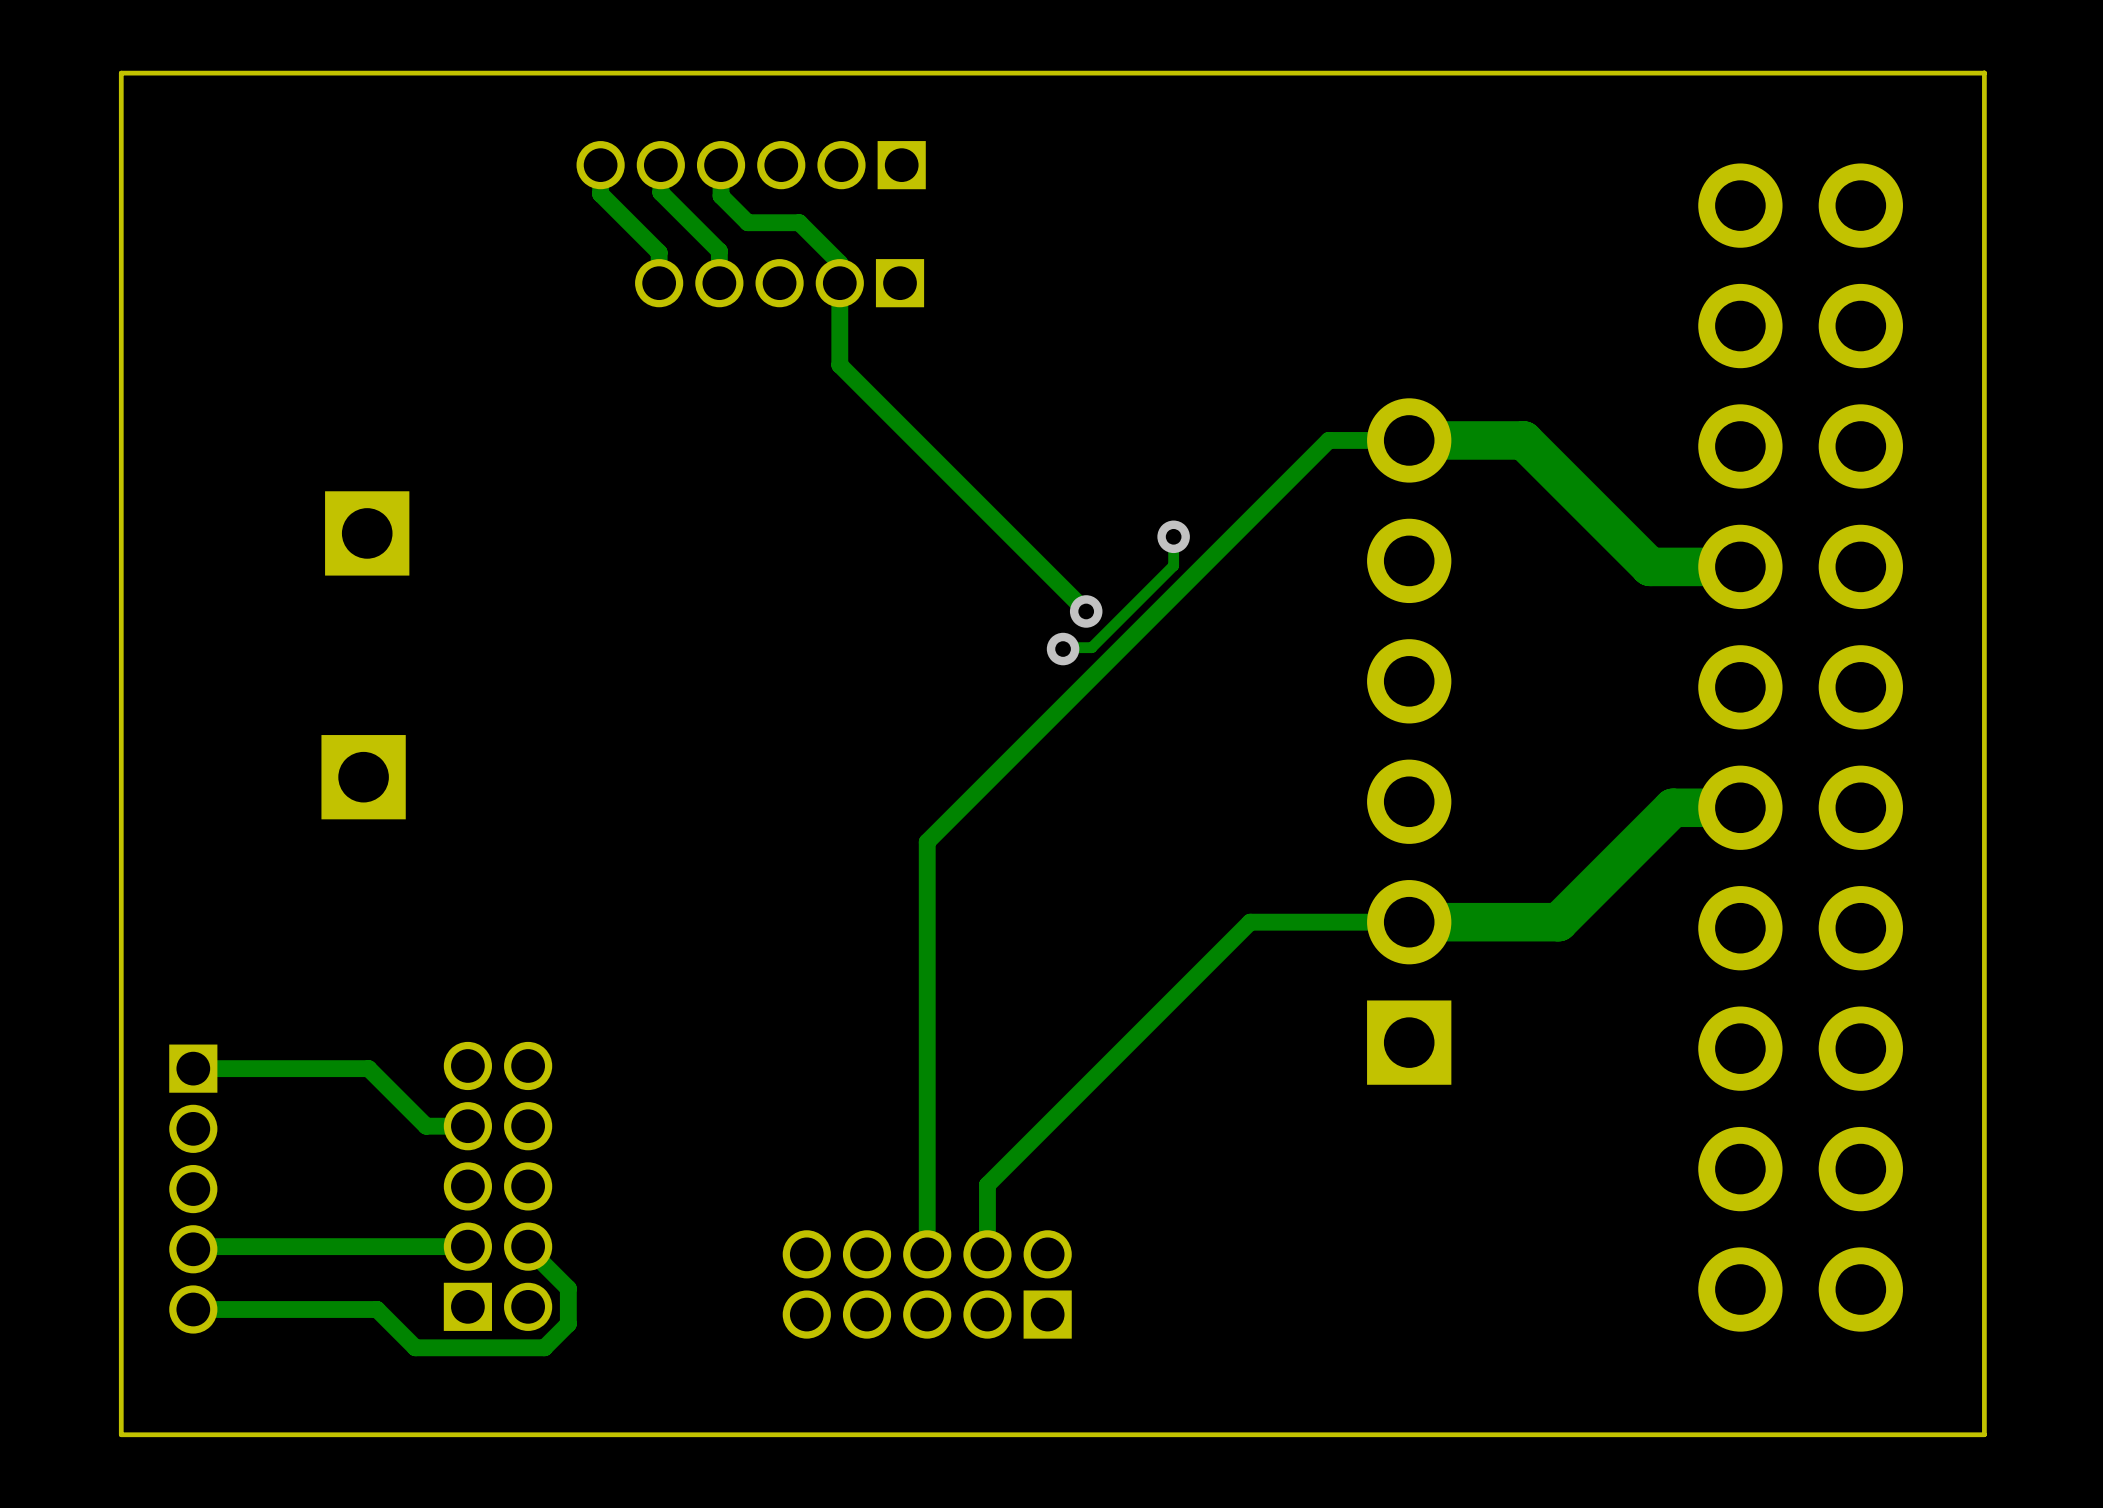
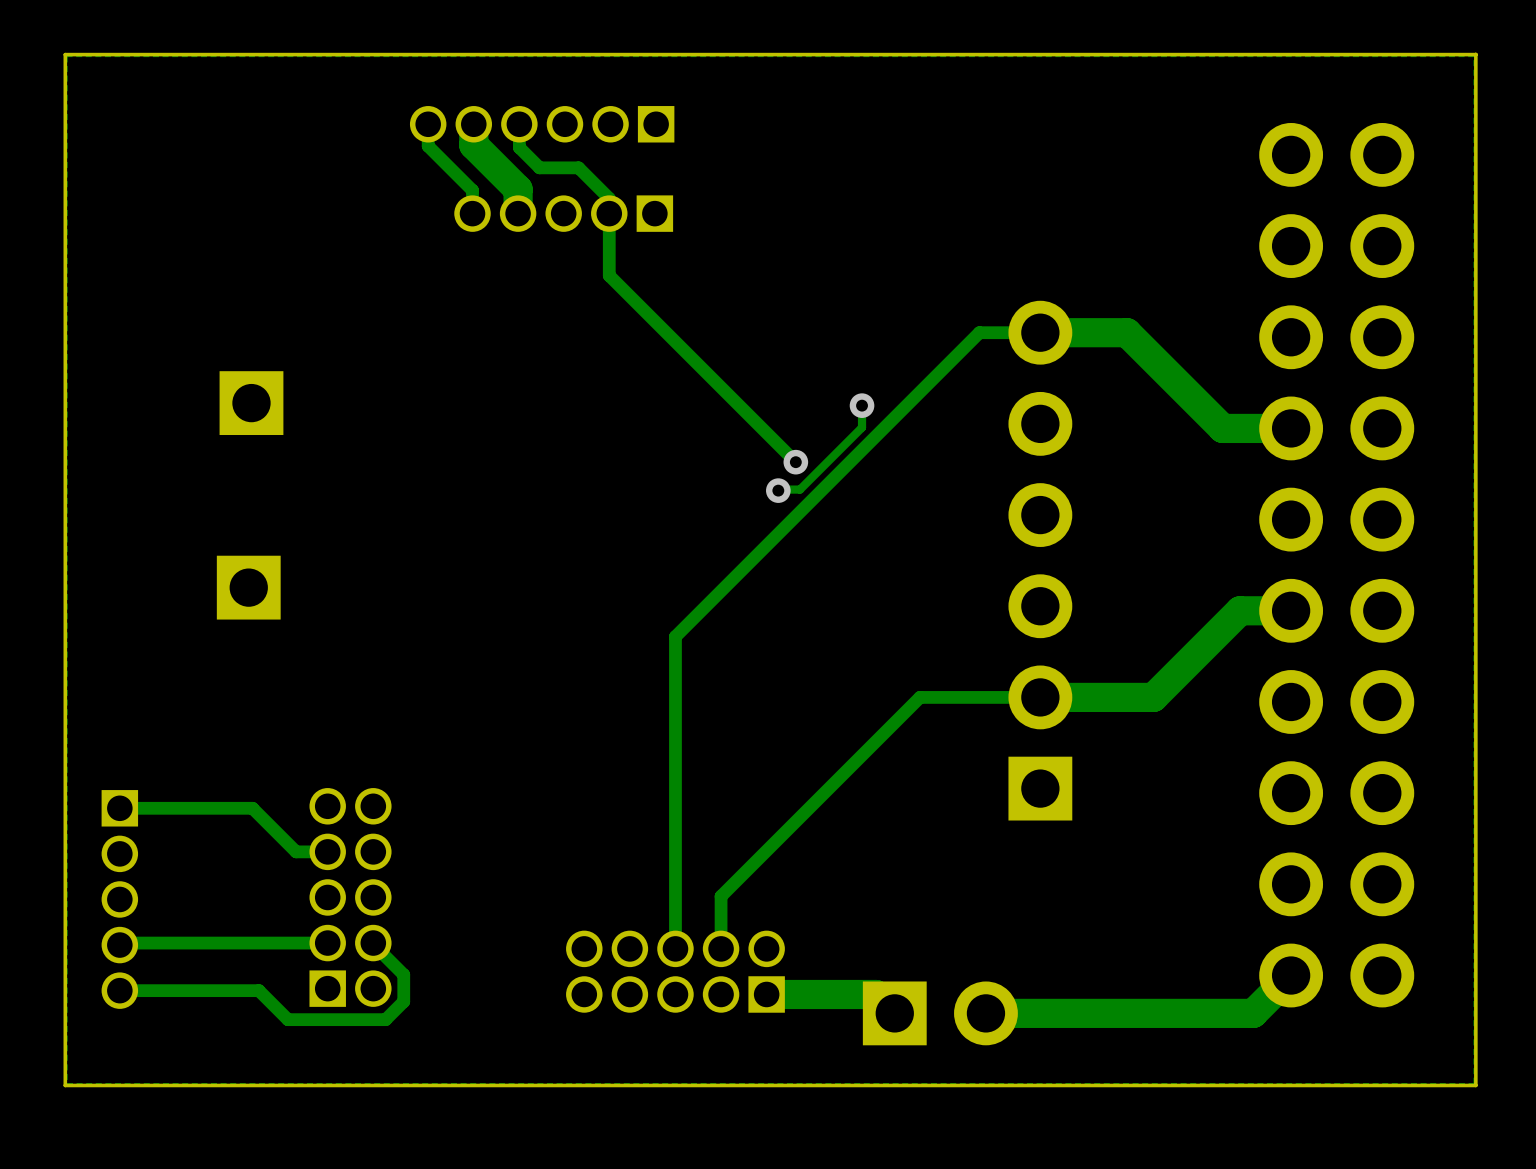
zone outline: none -> (1474, 56) (66, 56) (66, 1083) (1474, 1083) (1474, 56)
track width: thin (660, 165) (660, 192) (719, 251) (719, 283) -> thick (473, 124) (473, 145) (518, 189) (518, 213)
track: none -> (1291, 975) (1253, 1013) (985, 1013)
track: none -> (766, 994) (875, 994) (894, 1013)
part: none -> (940, 1013)

